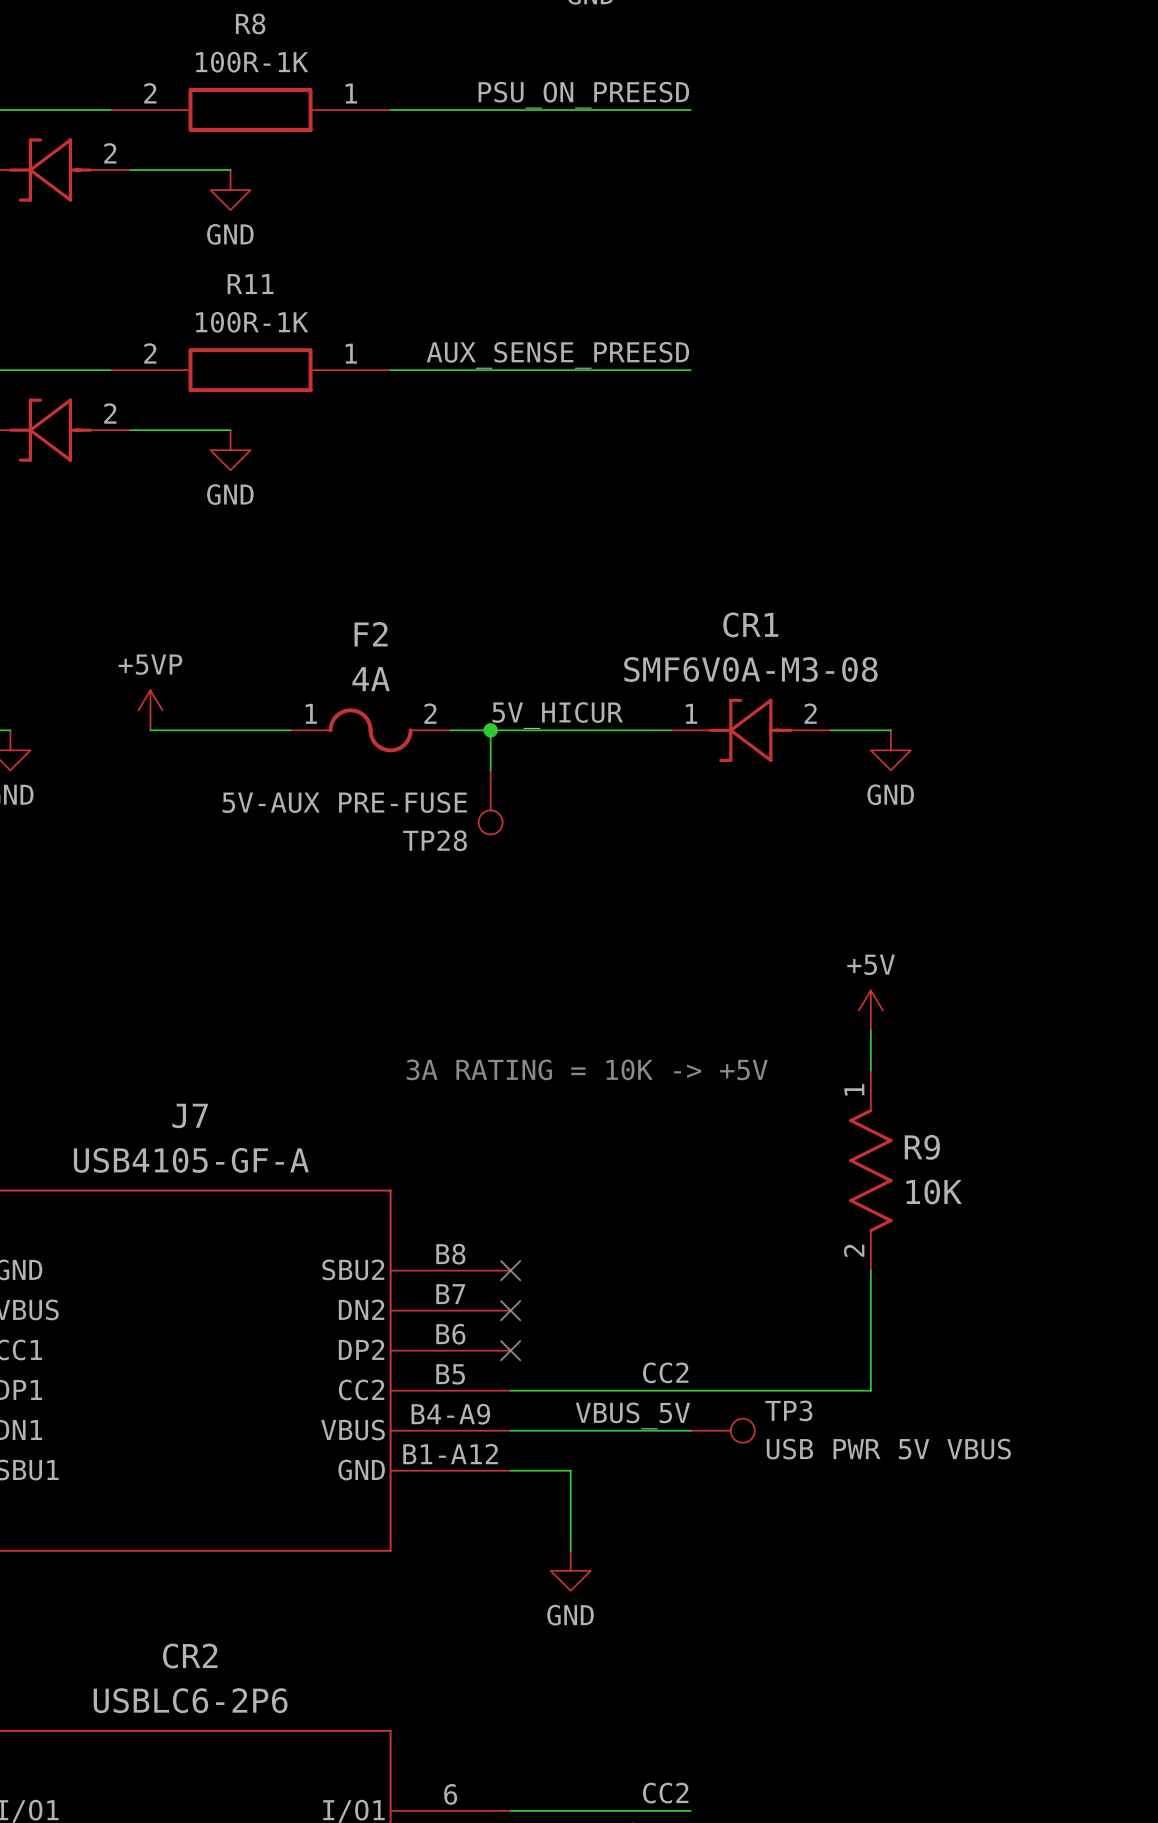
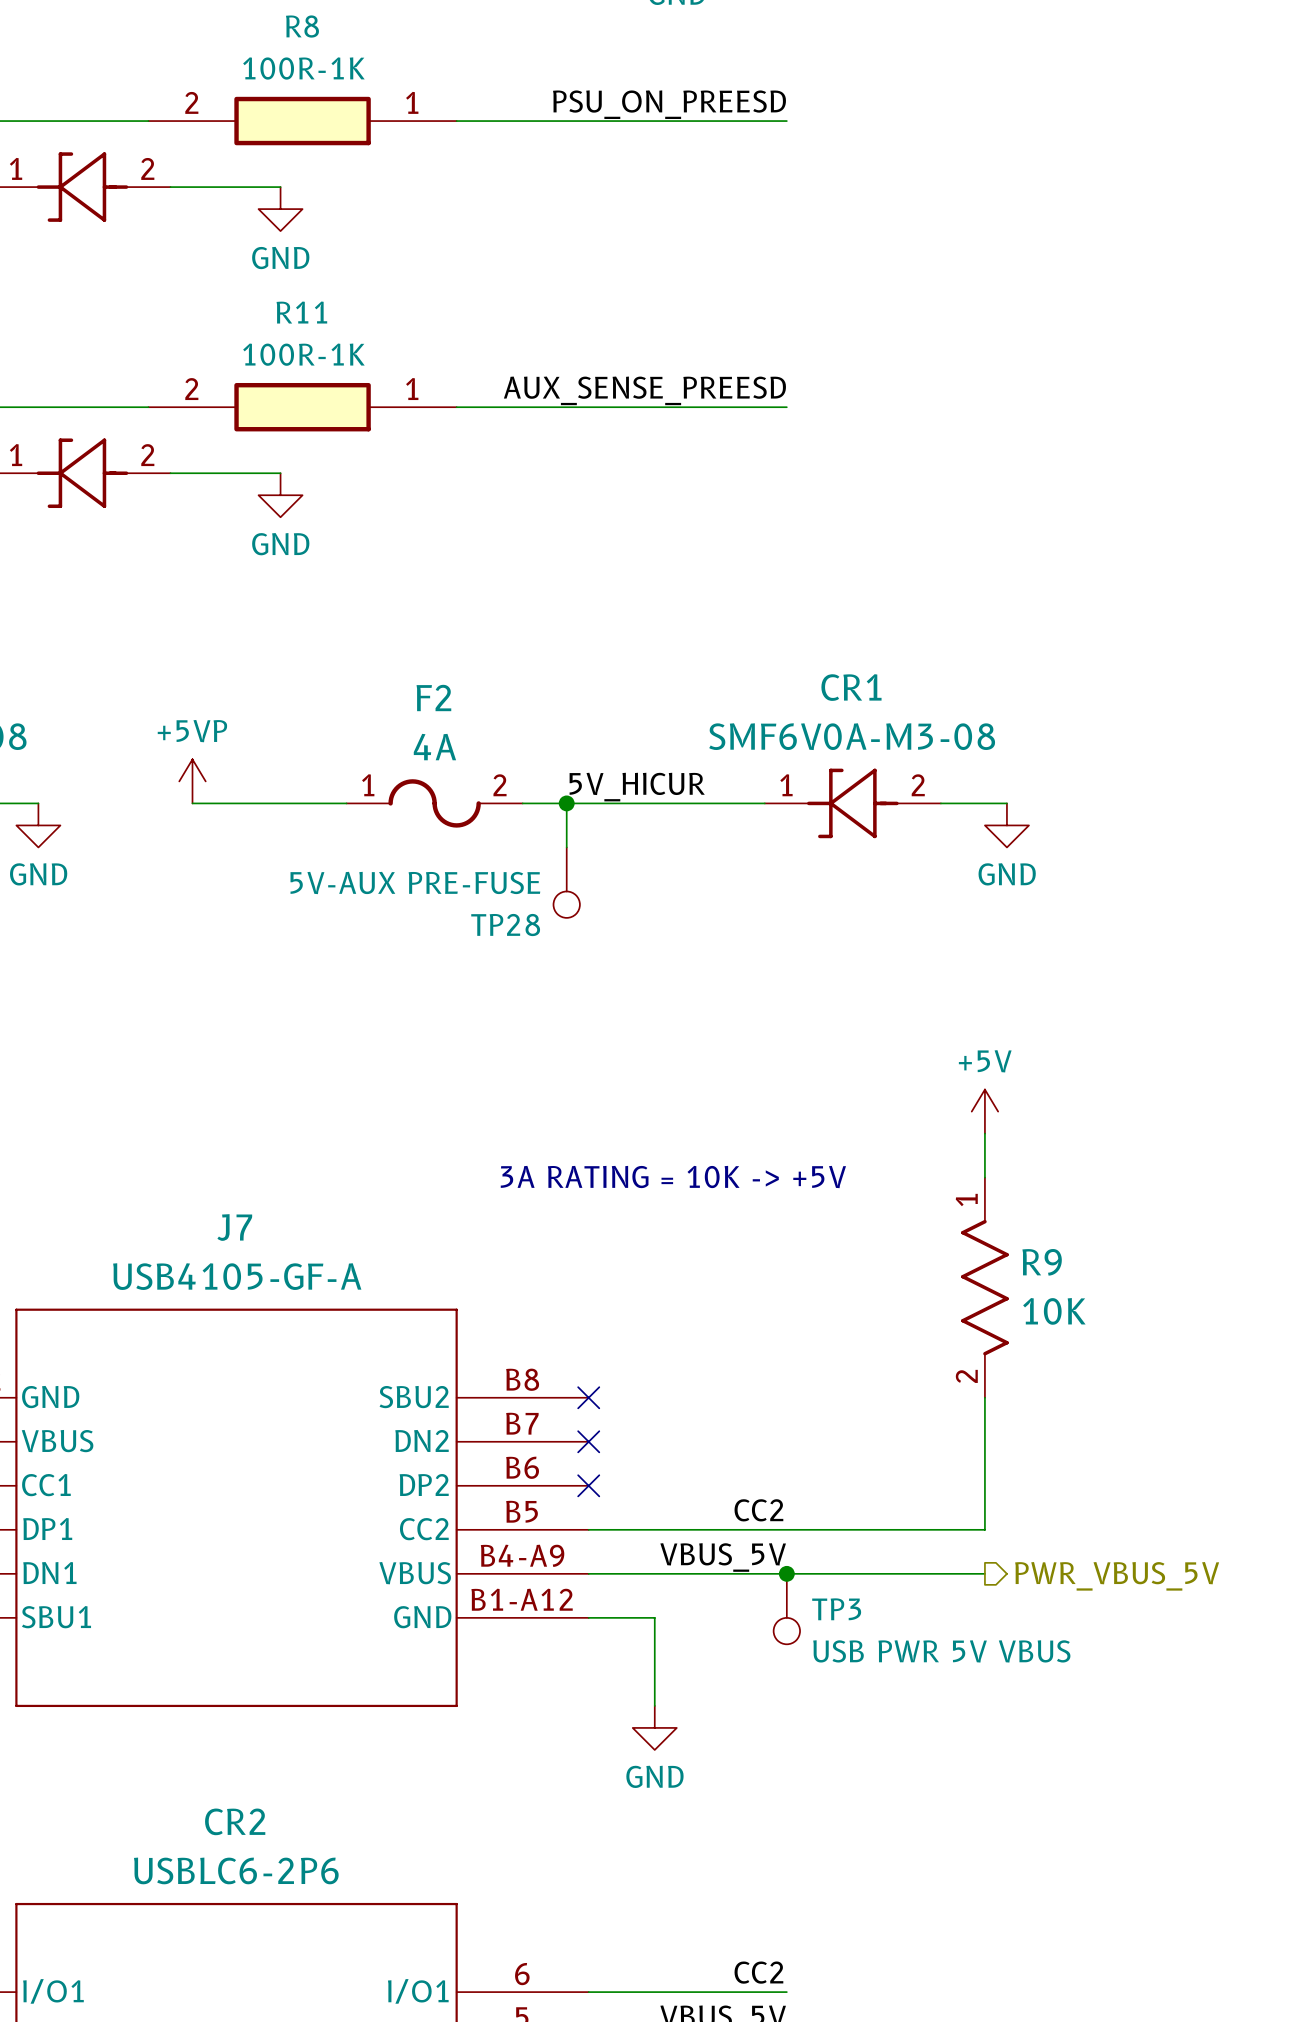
wire: none -> (786, 1573) (984, 1573)
junction: none -> (786, 1573)
TP3 position: (722, 1430) -> (786, 1609)
TP3 rotation: 0° (742, 1430) -> 90° clockwise (786, 1631)
hierarchical label: none -> PWR_VBUS_5V (1117, 1576)

